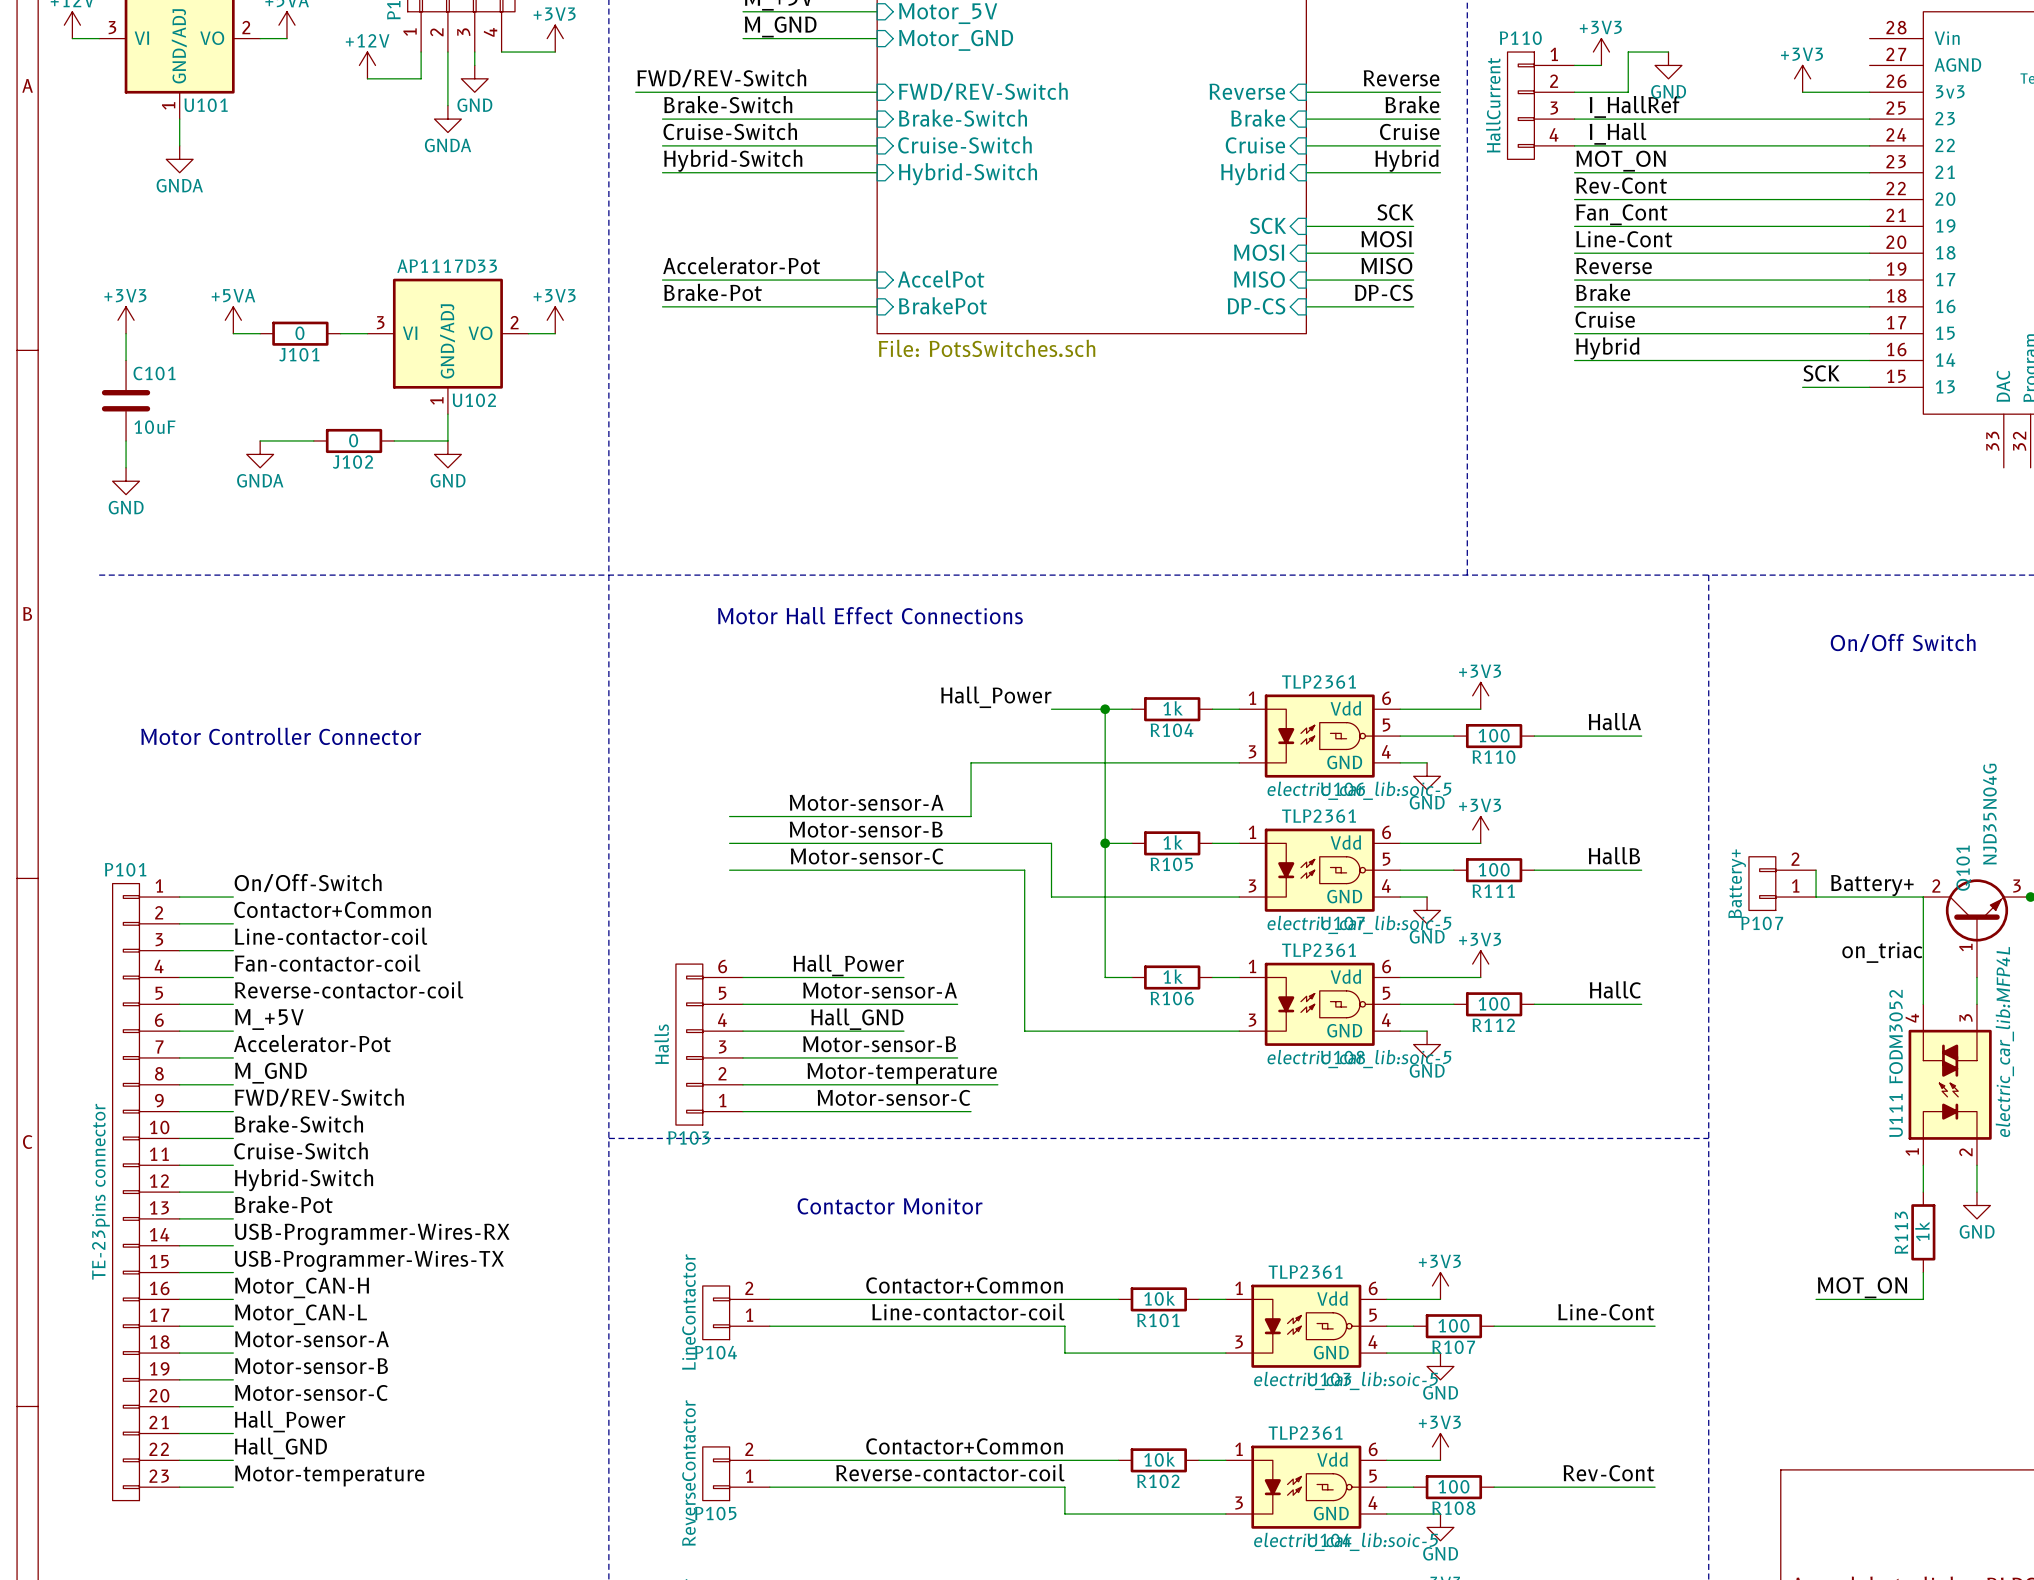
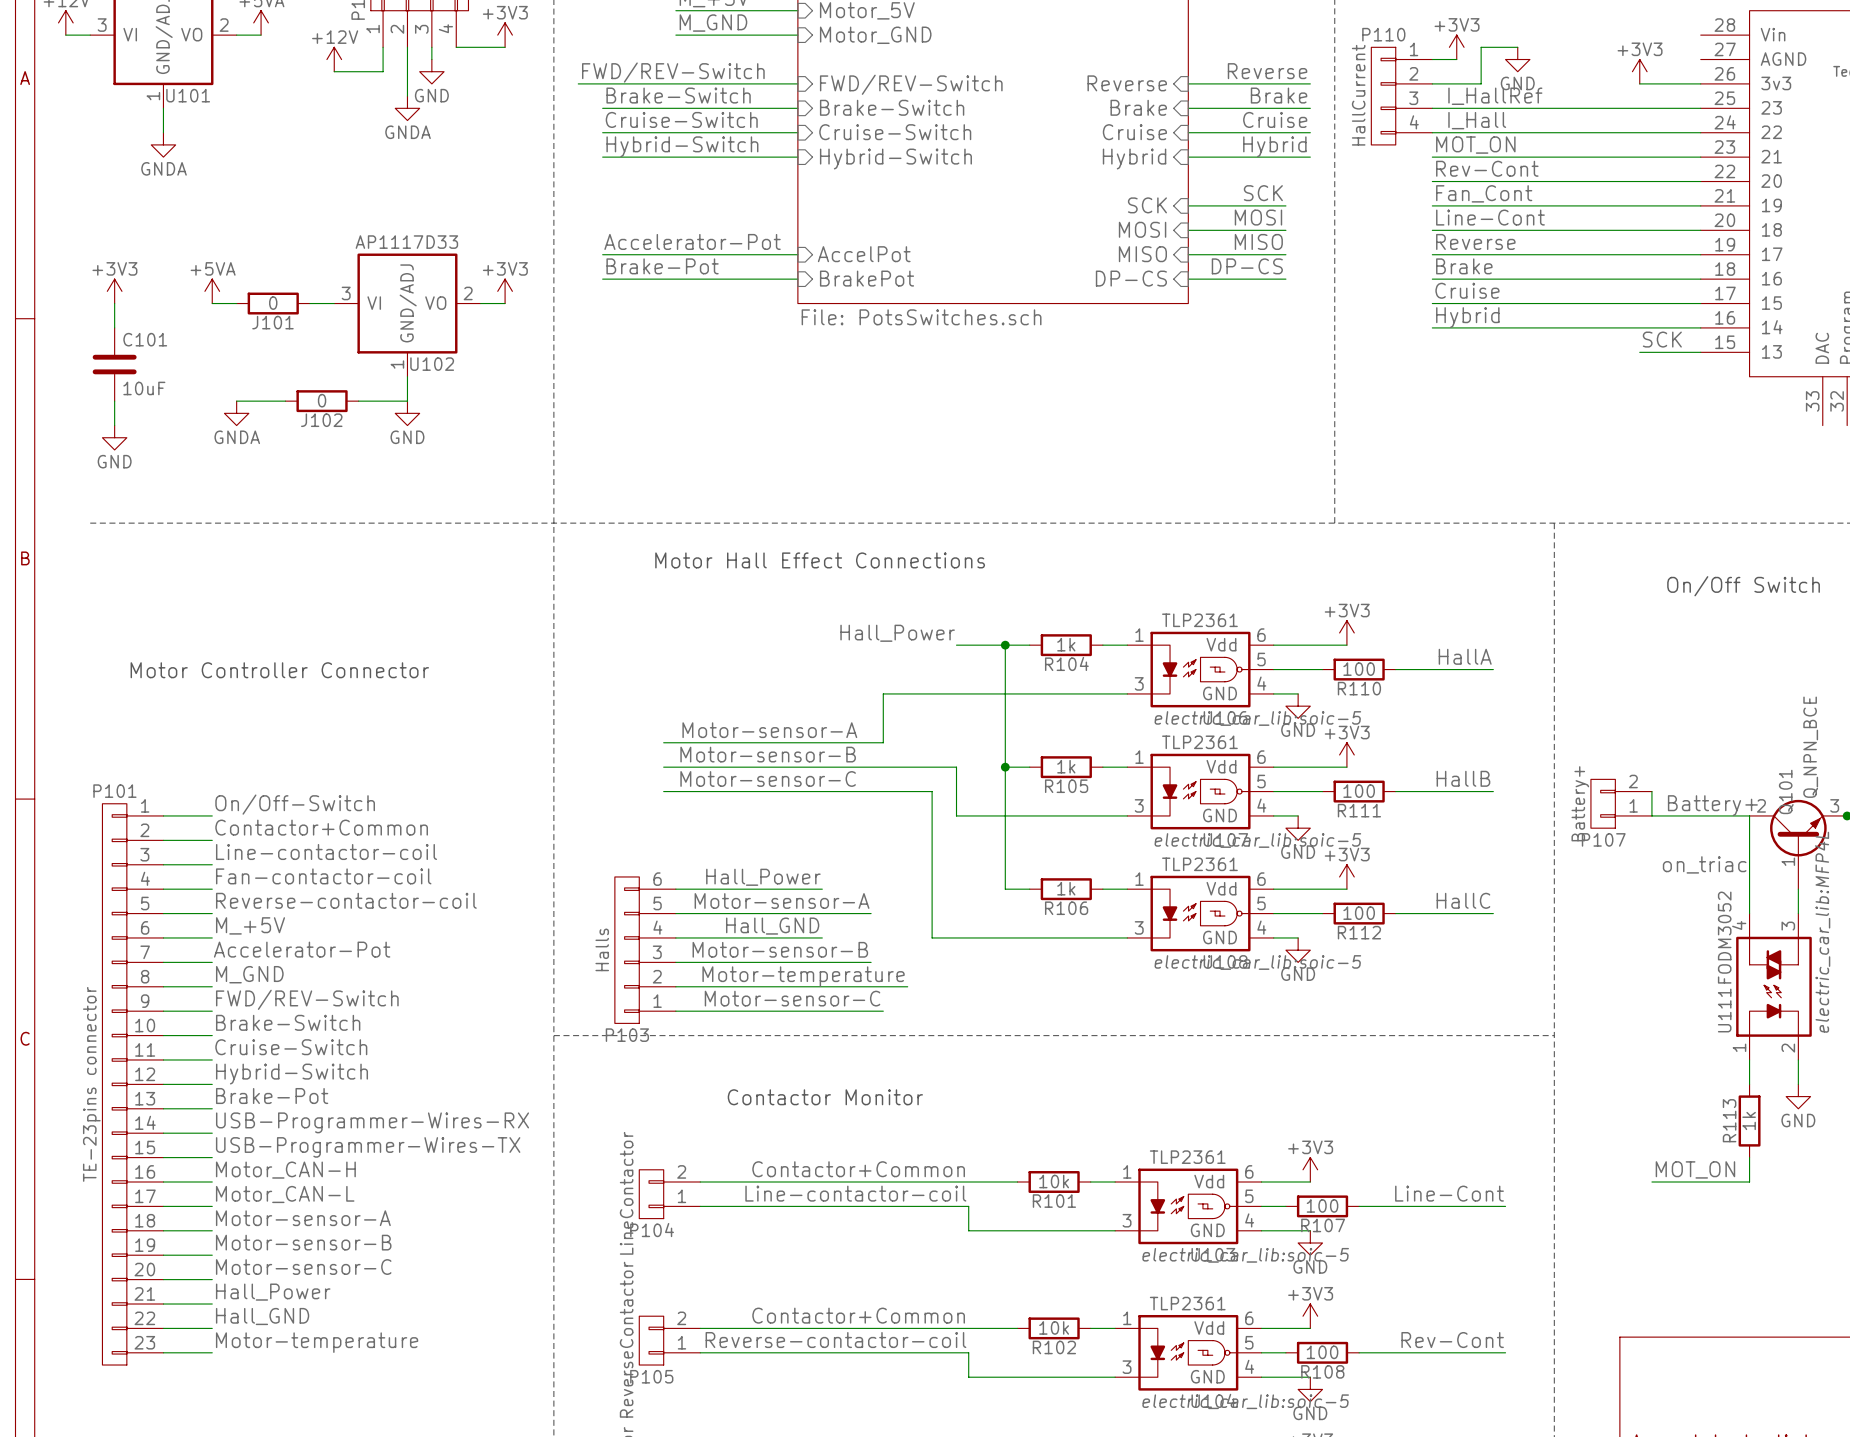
Q101 value: NJD35N04G (1989, 814) -> Q_NPN_BCE (1810, 747)

